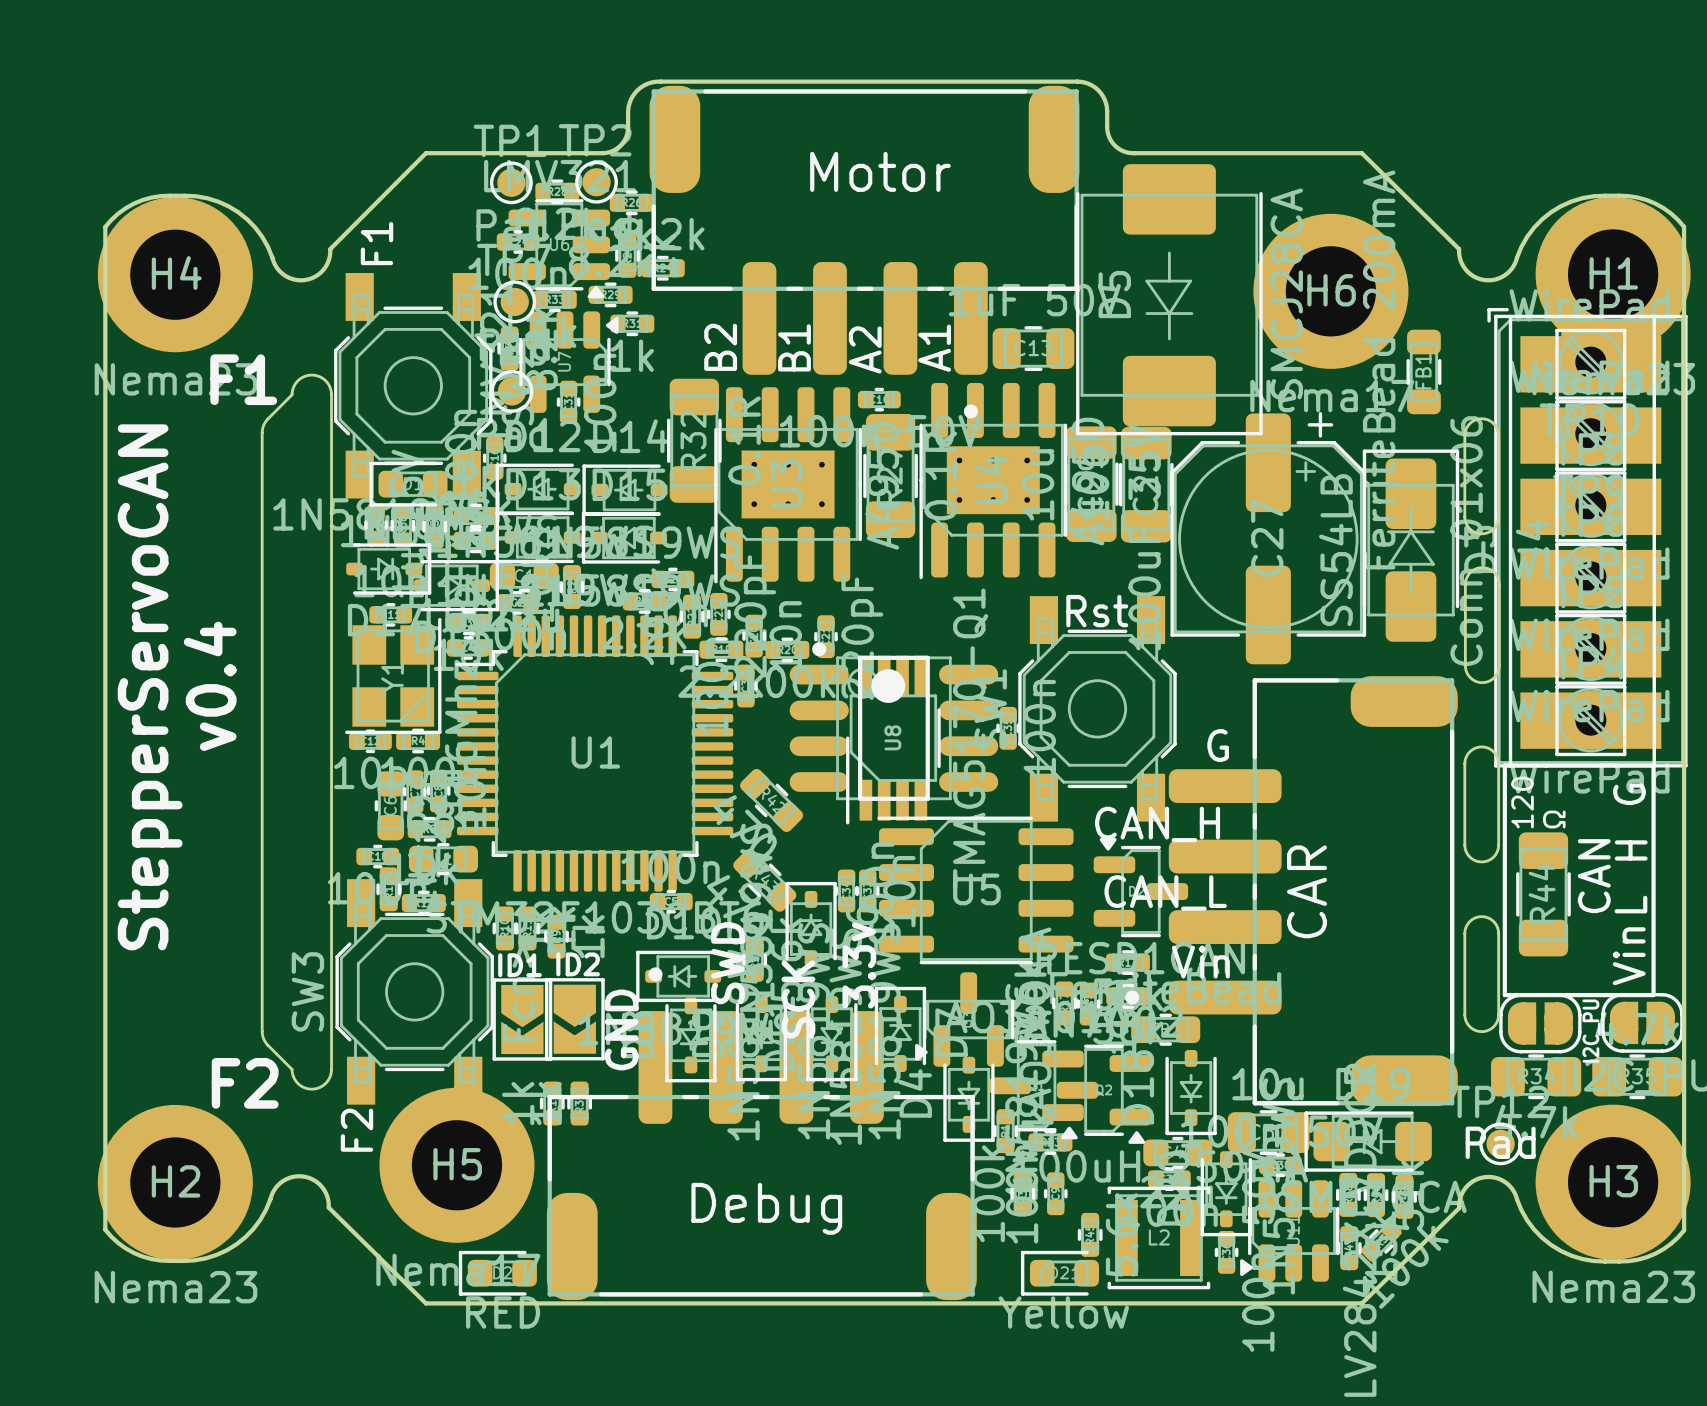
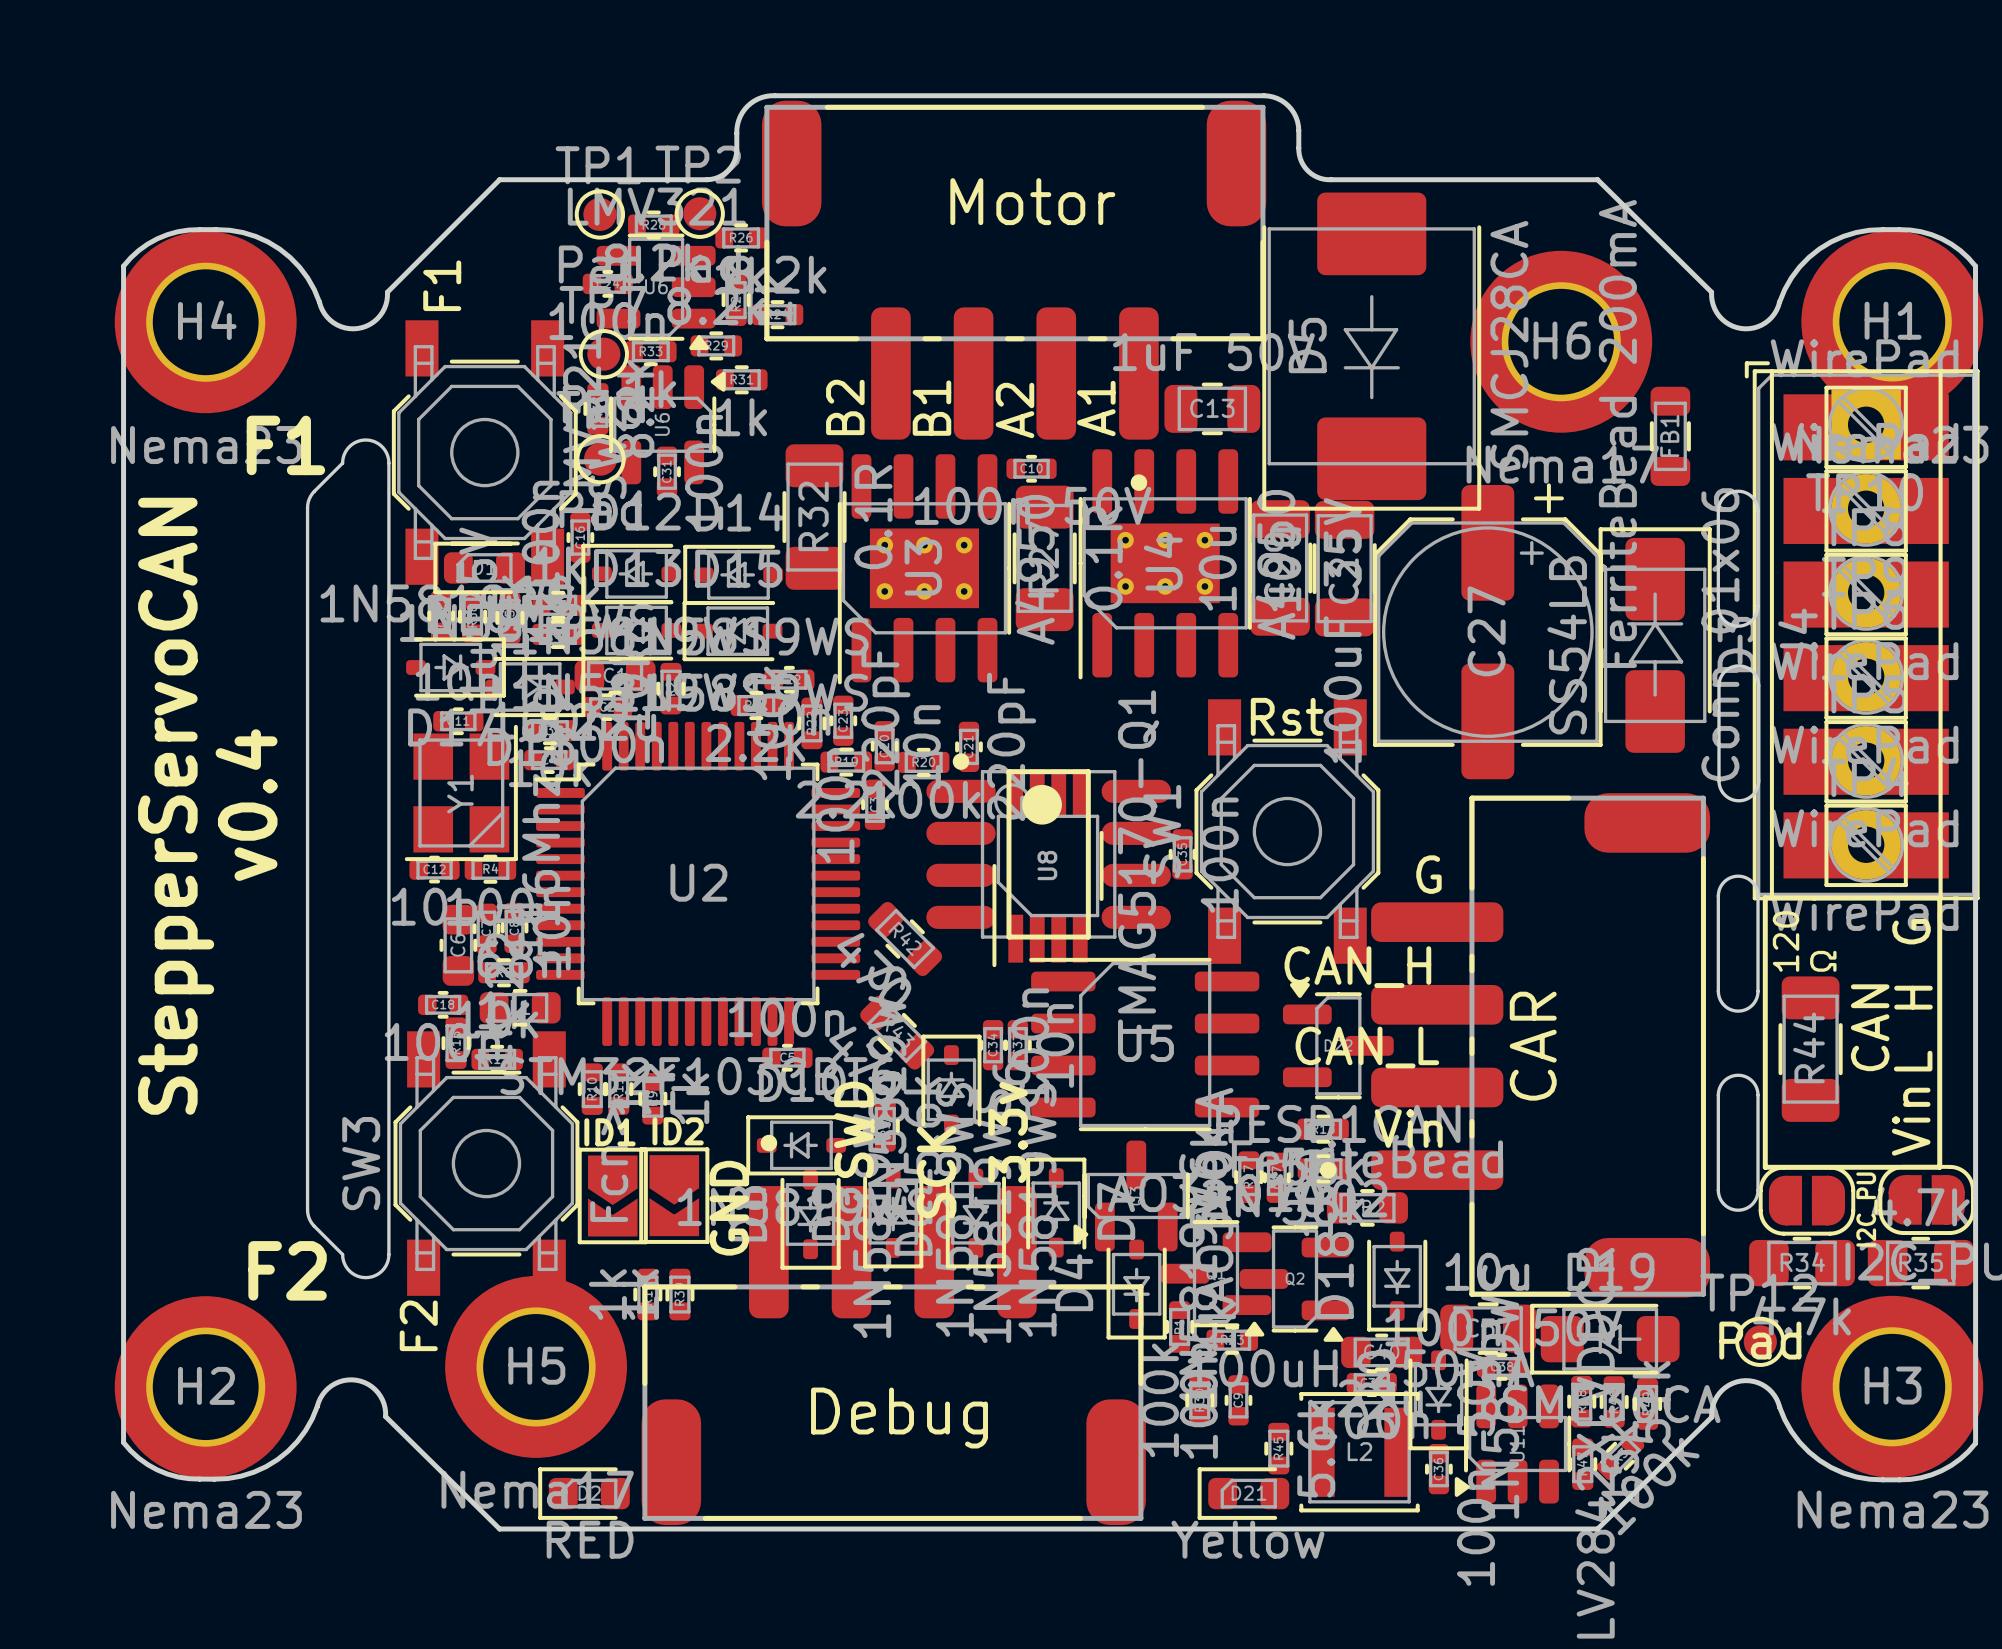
U7 name: U7 (564, 361) -> U6 (662, 424)
U1 name: U1 (595, 752) -> U2 (698, 882)

